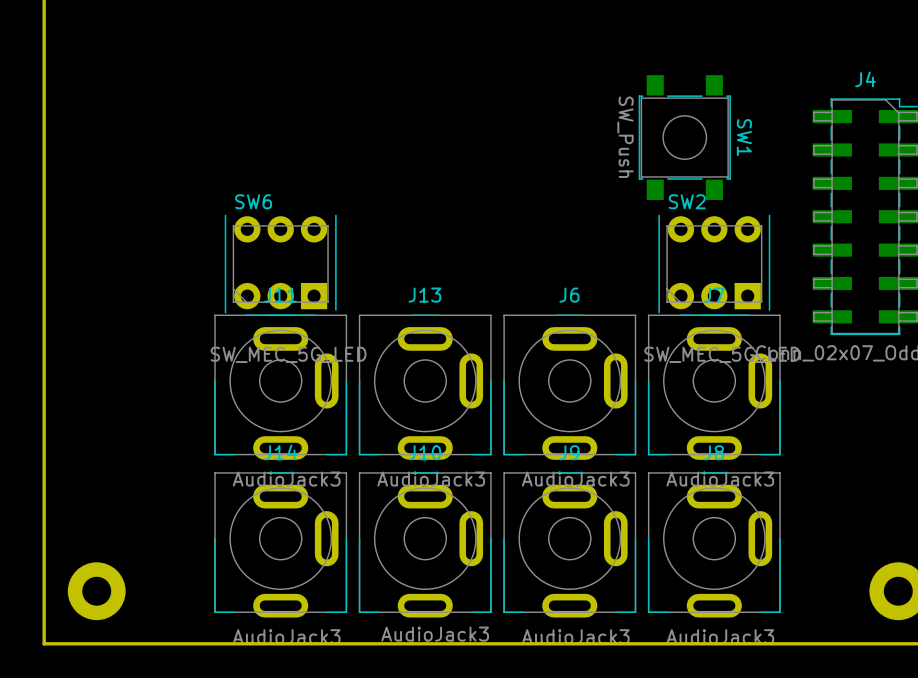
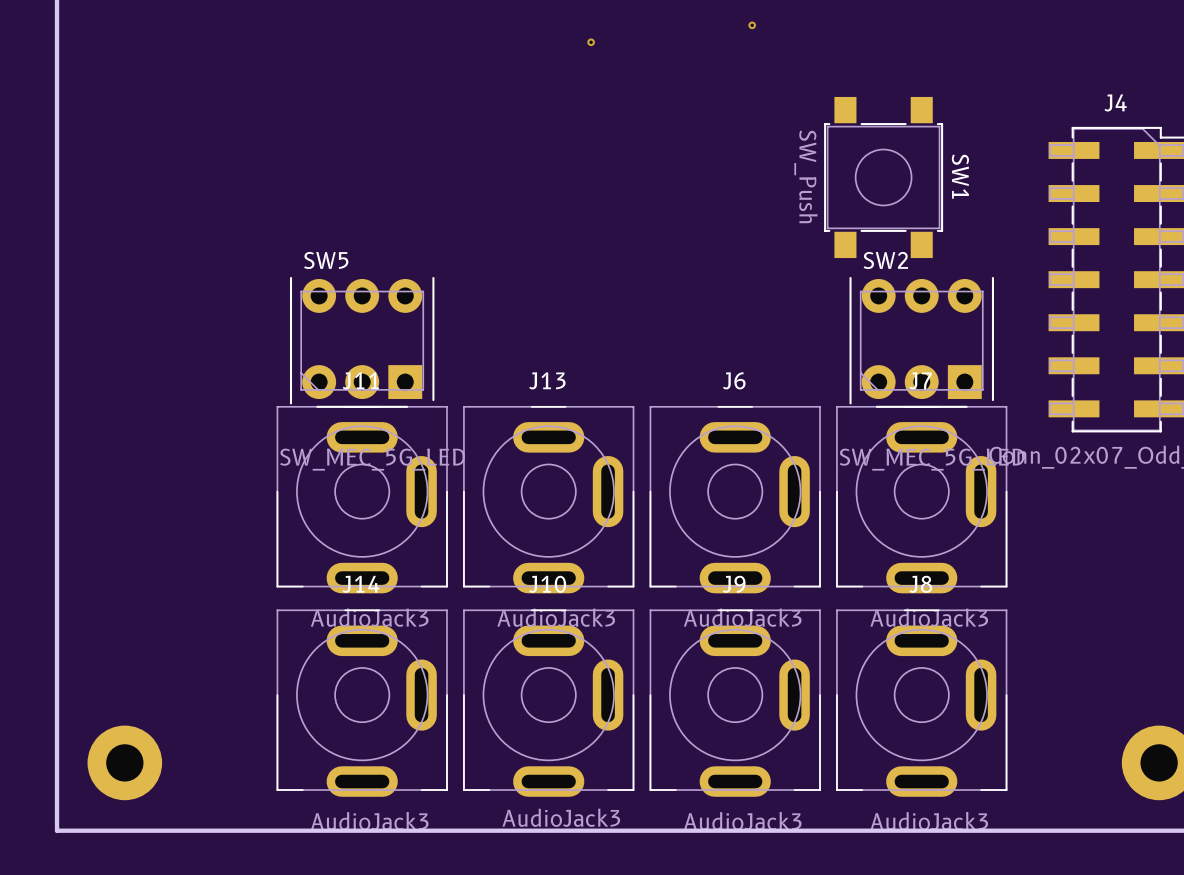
via: none -> (752, 25)
via: none -> (591, 42)
SW6 name: SW6 (253, 201) -> SW5 (326, 260)

